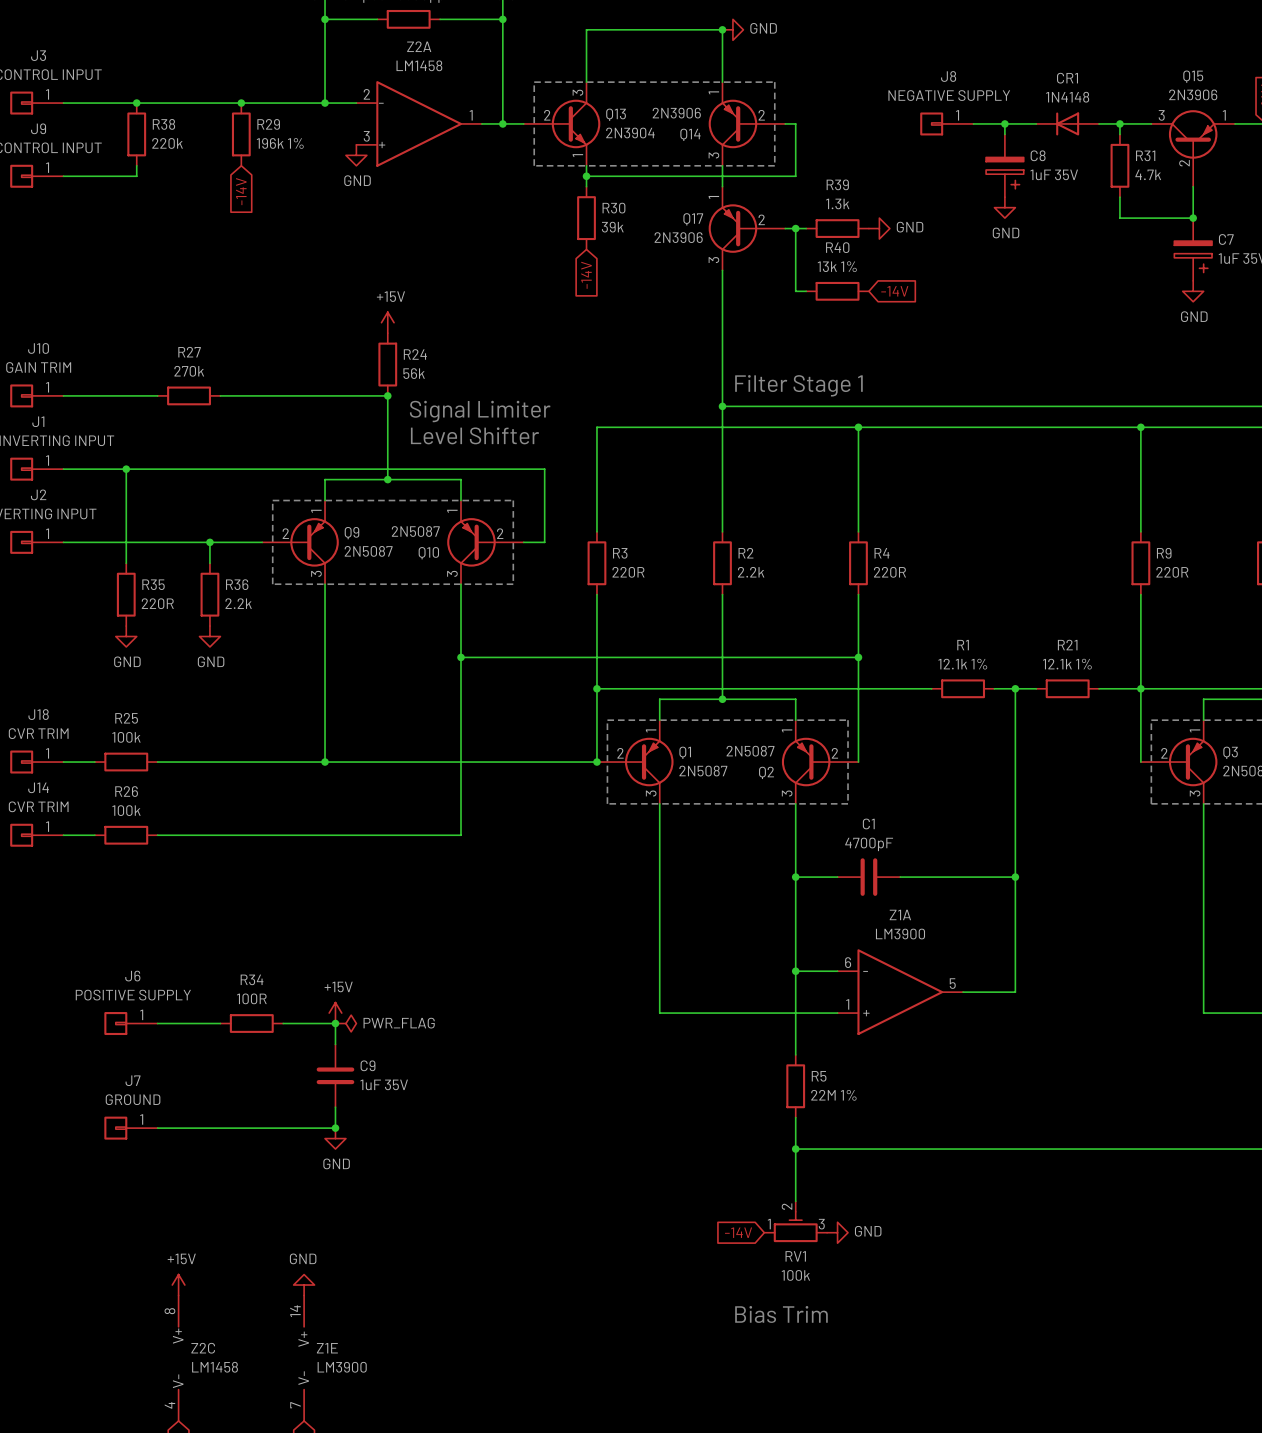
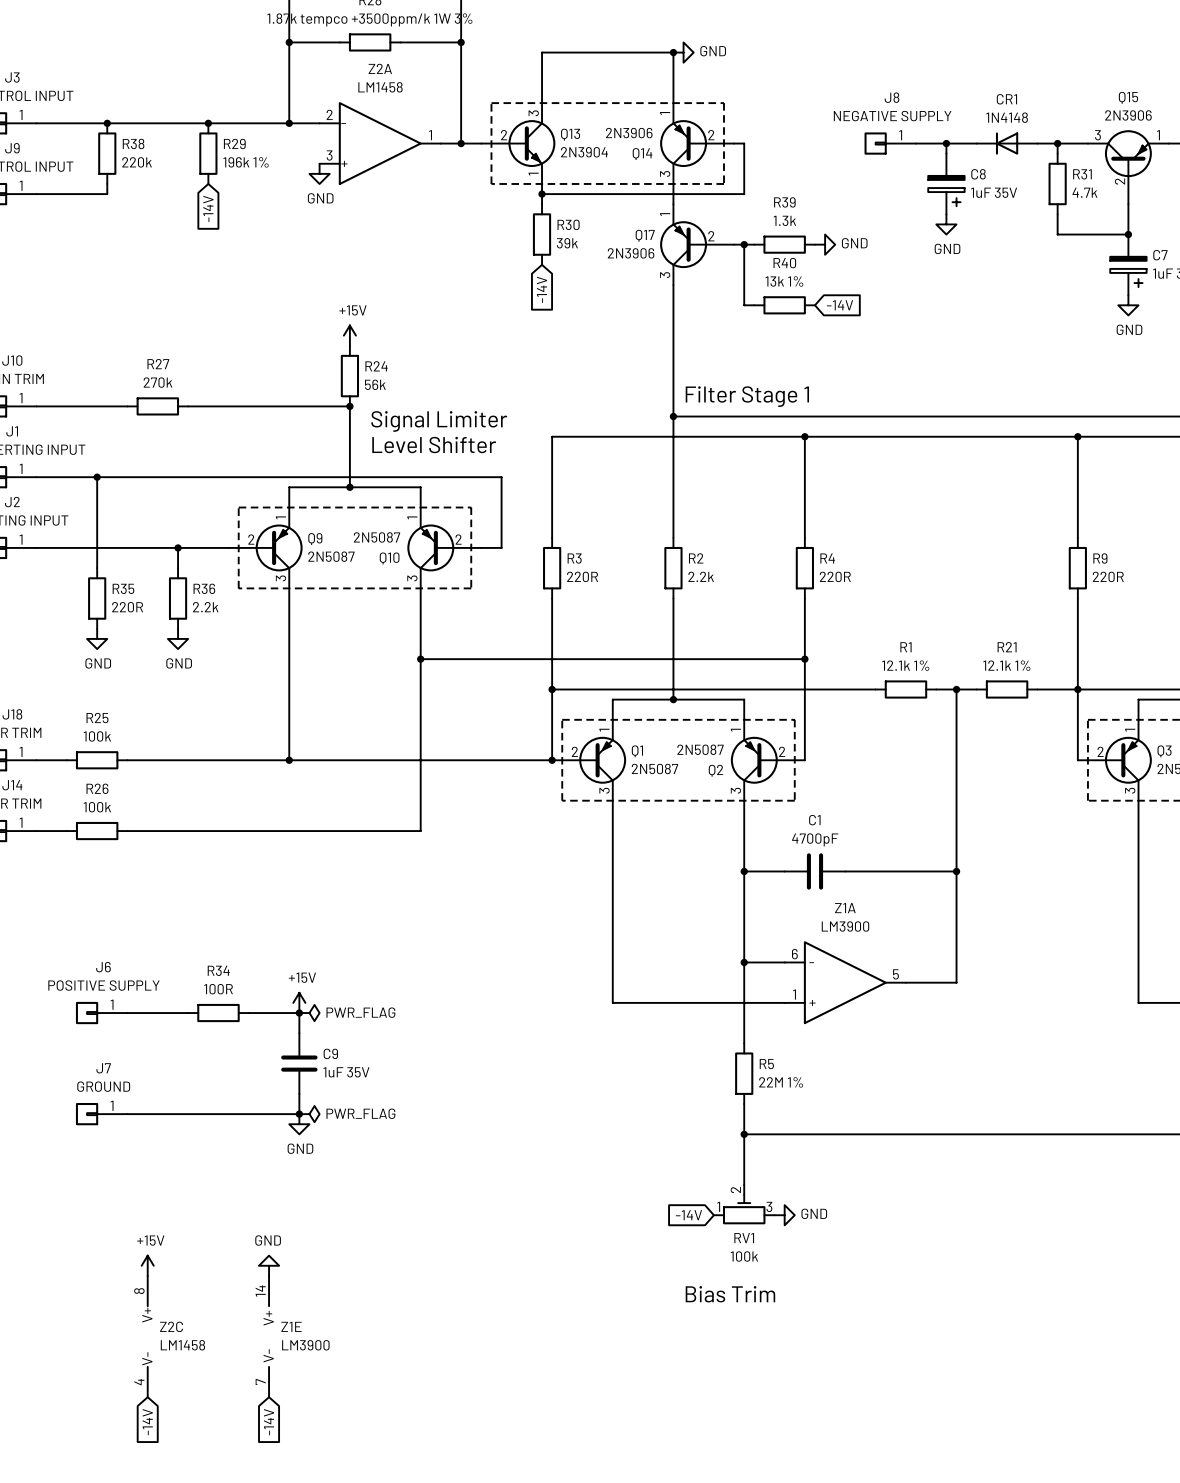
power symbol: none -> PWR_FLAG (309, 1114)

